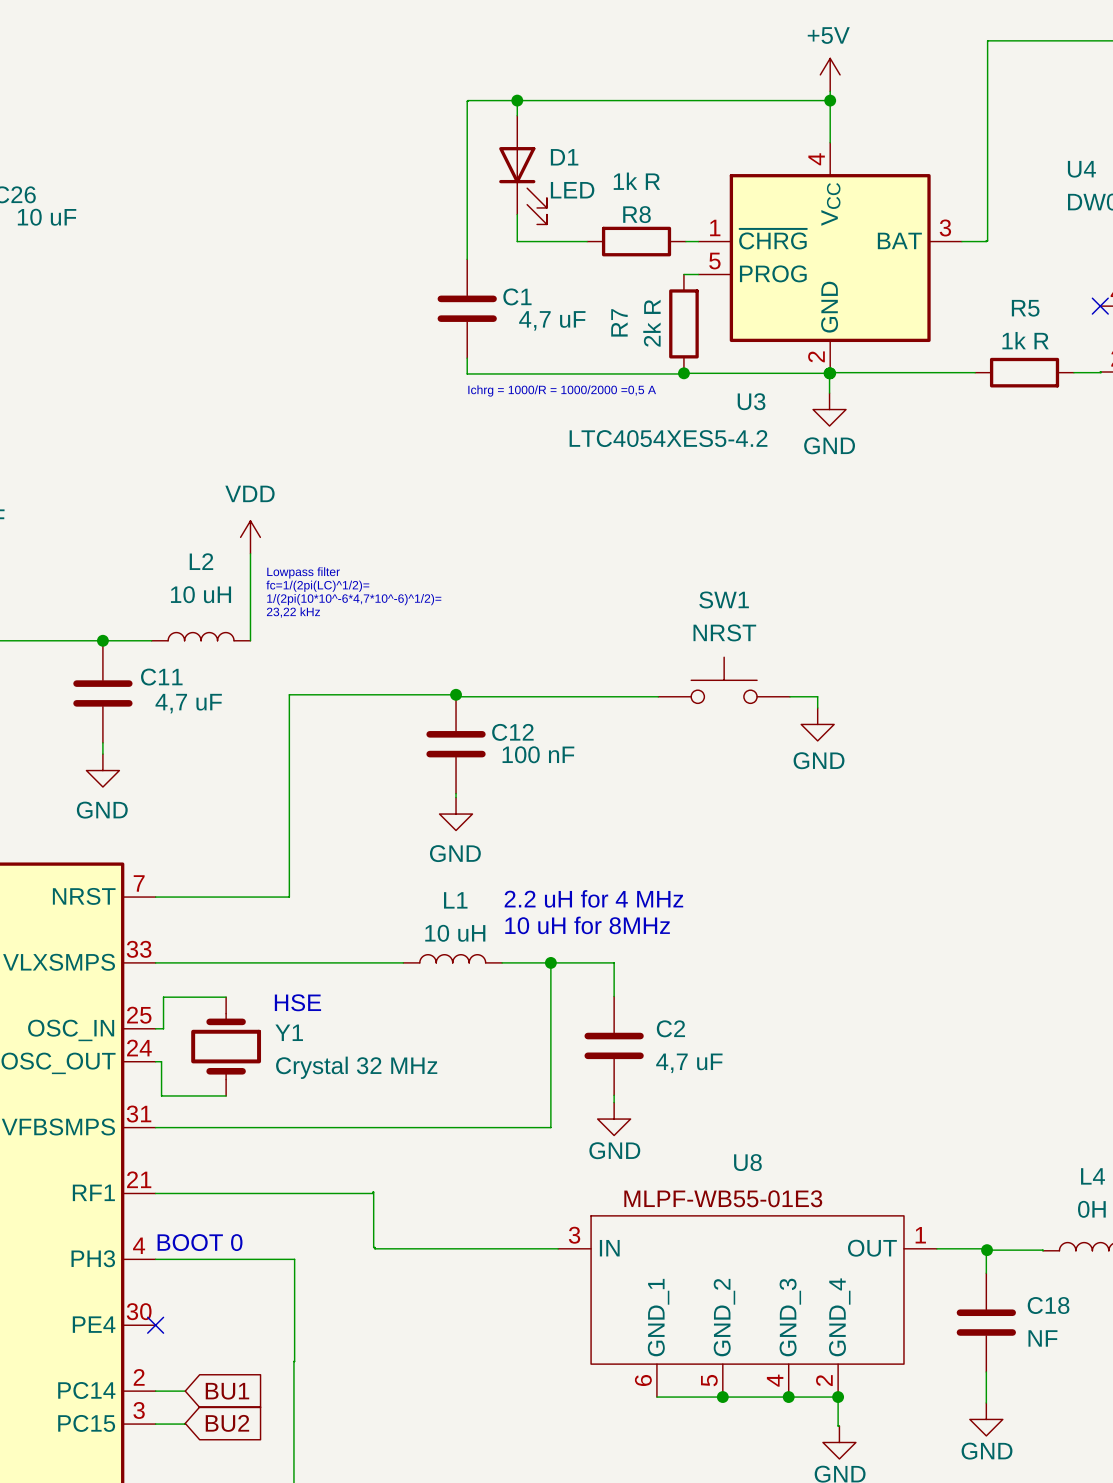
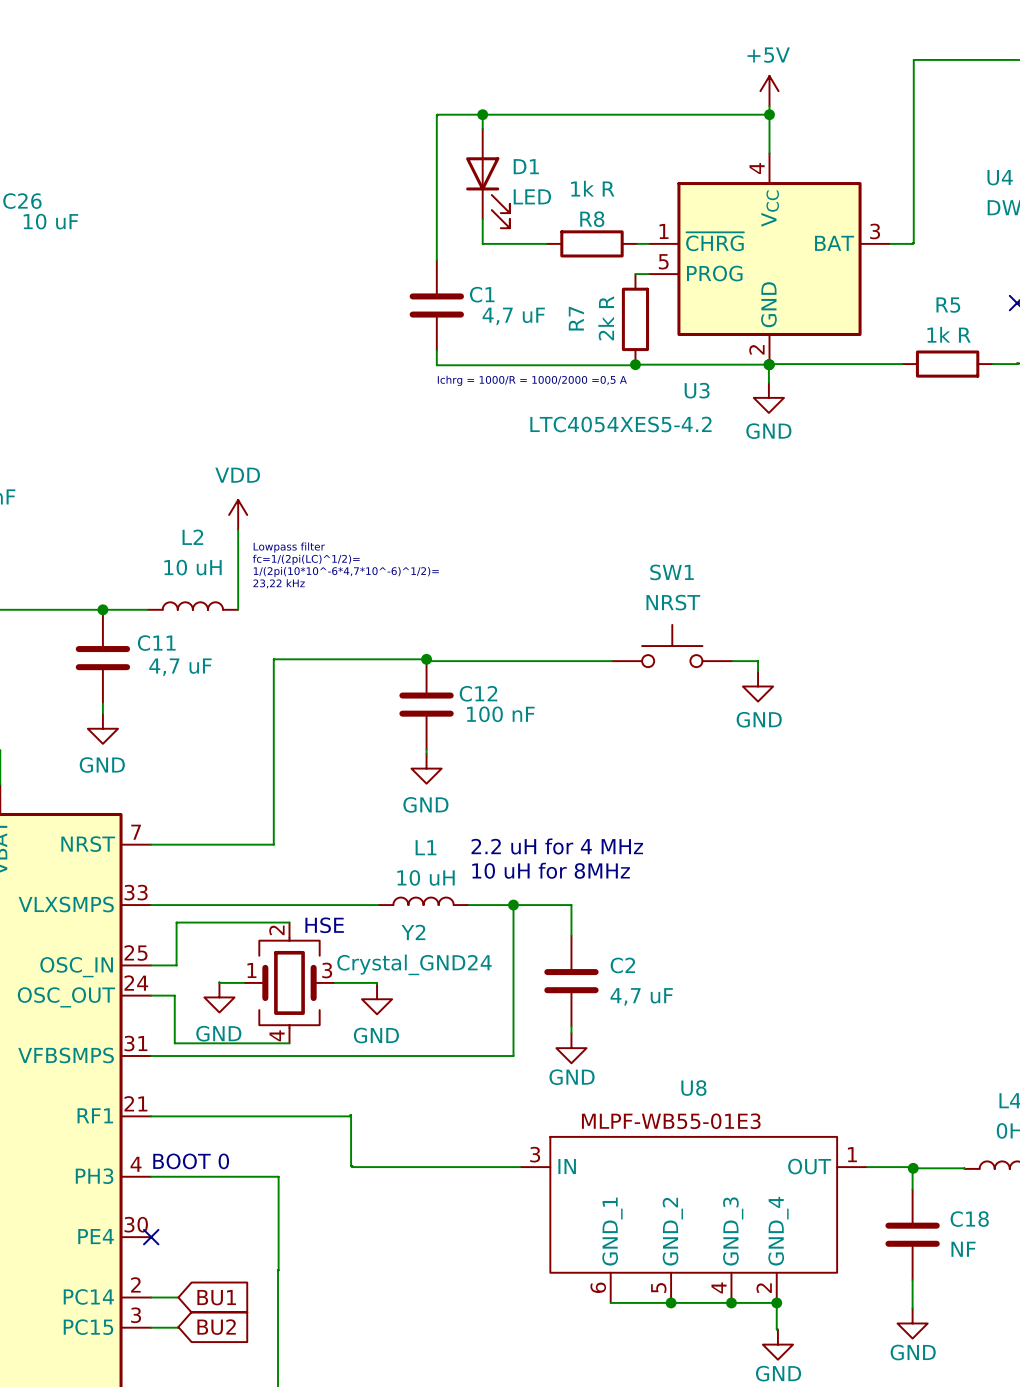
wire: (226, 997) (163, 997) (163, 1028) -> (289, 922) (176, 922) (176, 965) (158, 965)
text position: HSE (297, 1002) -> HSE (324, 925)
Y1: Crystal 32 MHz (226, 1046) -> none
wire: none -> (219, 982) (244, 982)
Y2: none -> Crystal_GND24 (289, 982)
wire: none -> (334, 982) (377, 984)
wire: (161, 1061) (161, 1095) (226, 1095) -> (156, 995) (174, 995) (174, 1043) (289, 1043)
power symbol: none -> GND (219, 997)
power symbol: none -> GND (377, 999)

